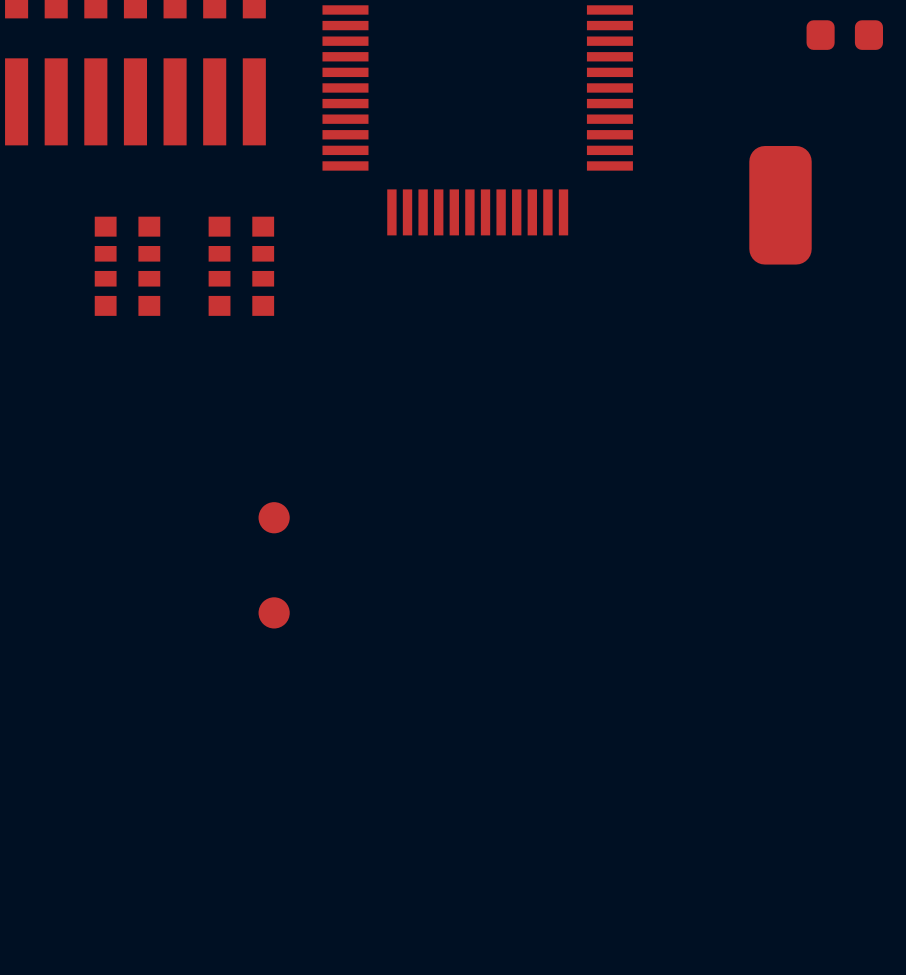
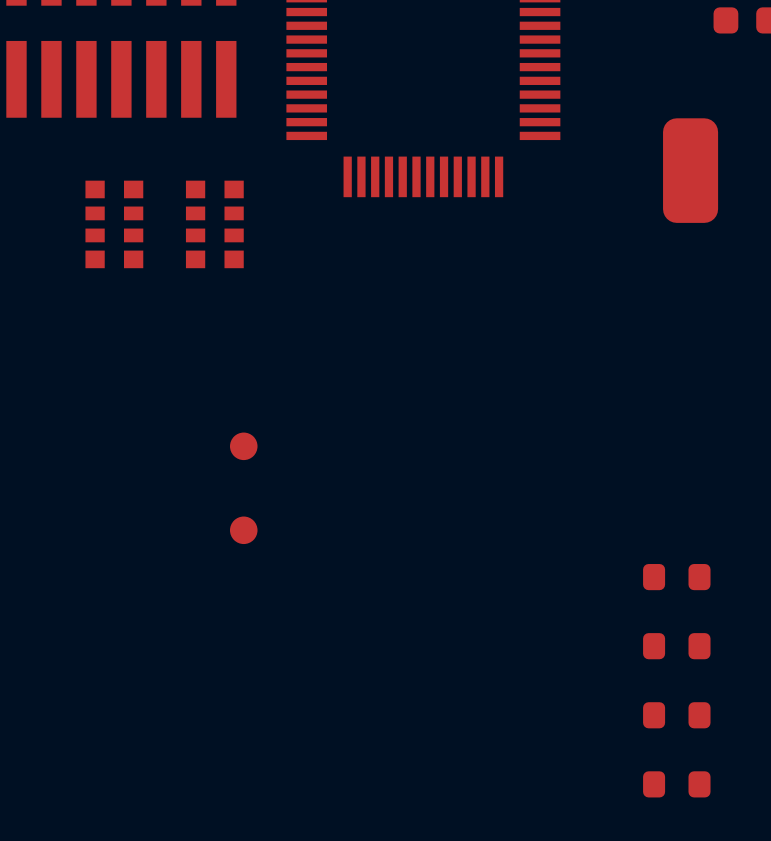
part: none -> (676, 577)
part: none -> (676, 646)
part: none -> (676, 715)
part: none -> (676, 784)

